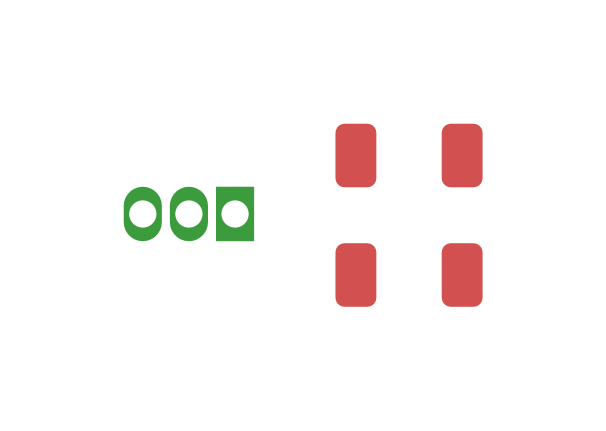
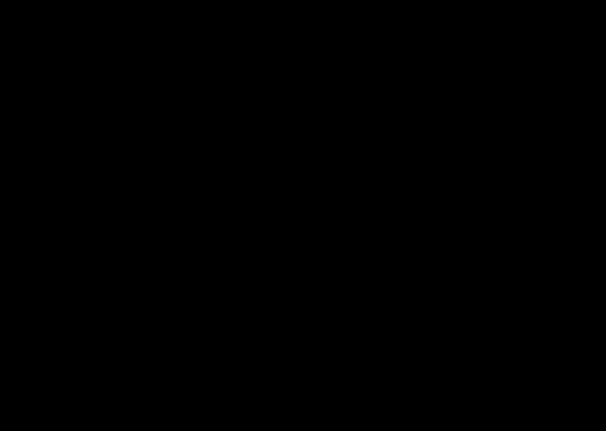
part: (409, 155) -> none
part: (188, 213) -> none
part: (409, 275) -> none

